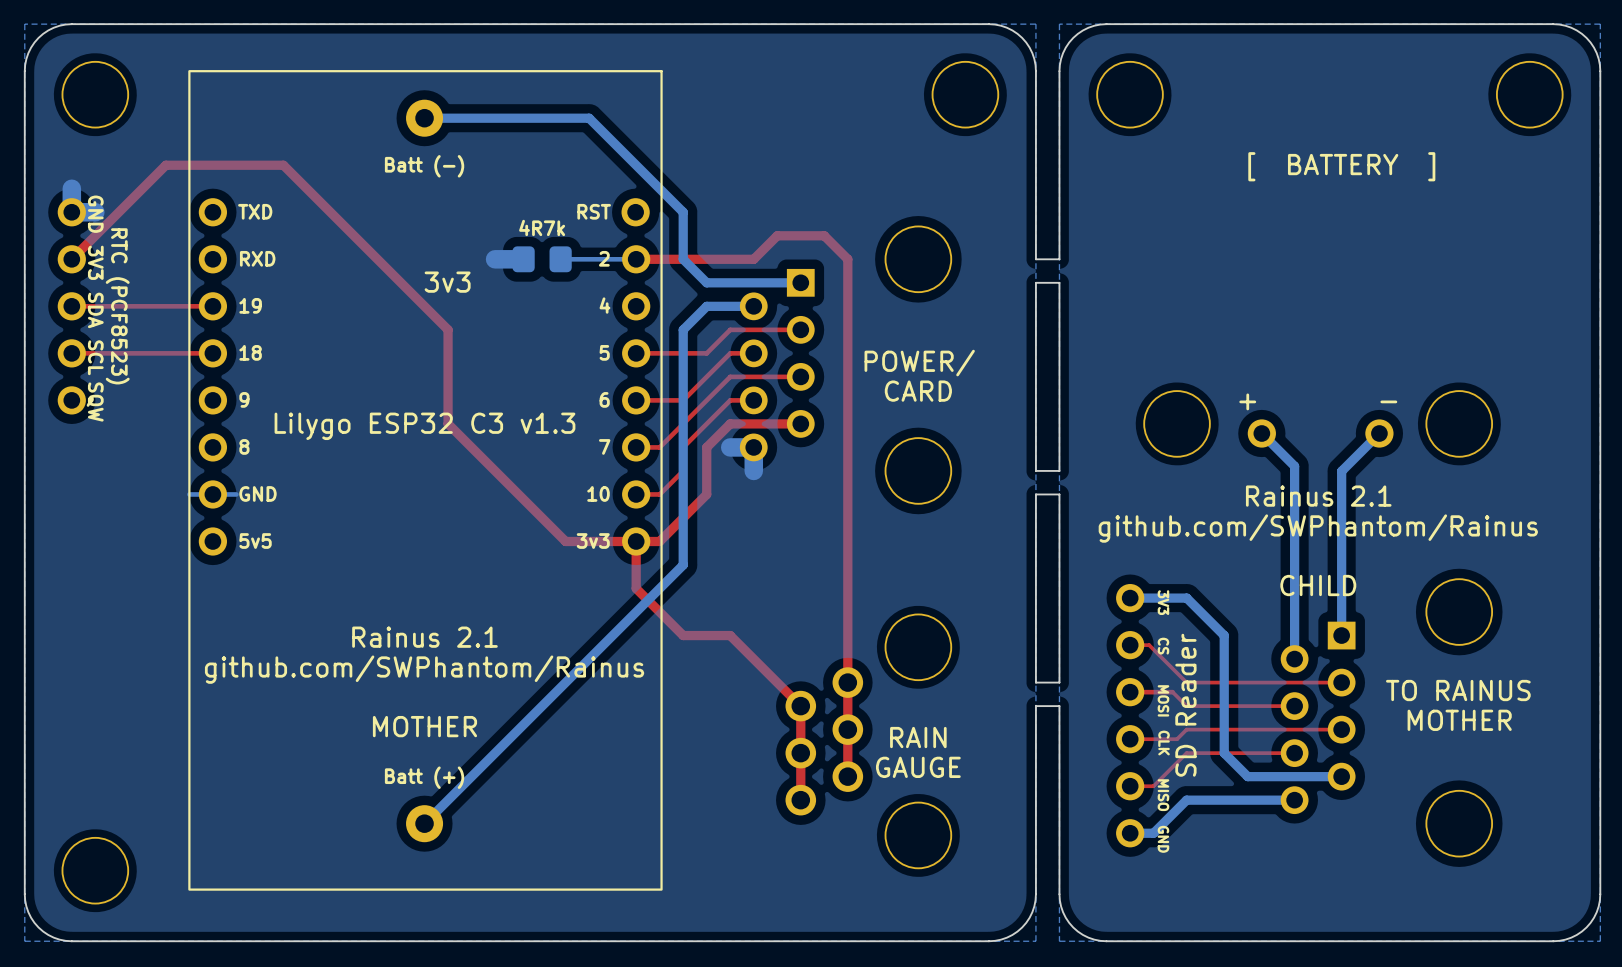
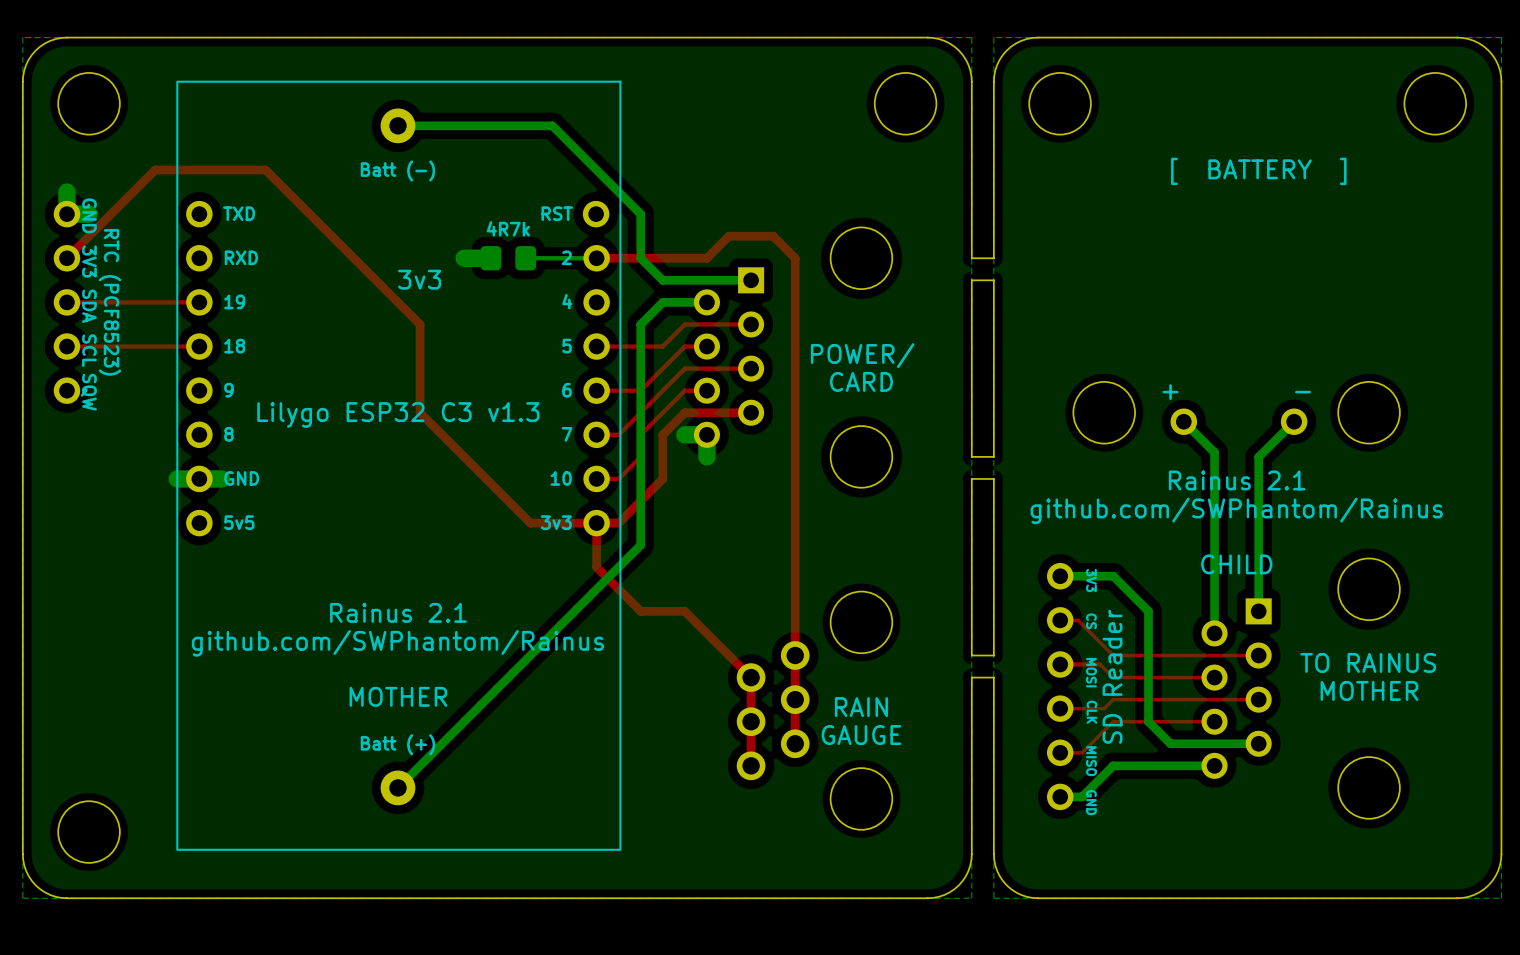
bottom track width: thin (236, 494) (189, 494) -> thick (221, 478) (177, 478)

